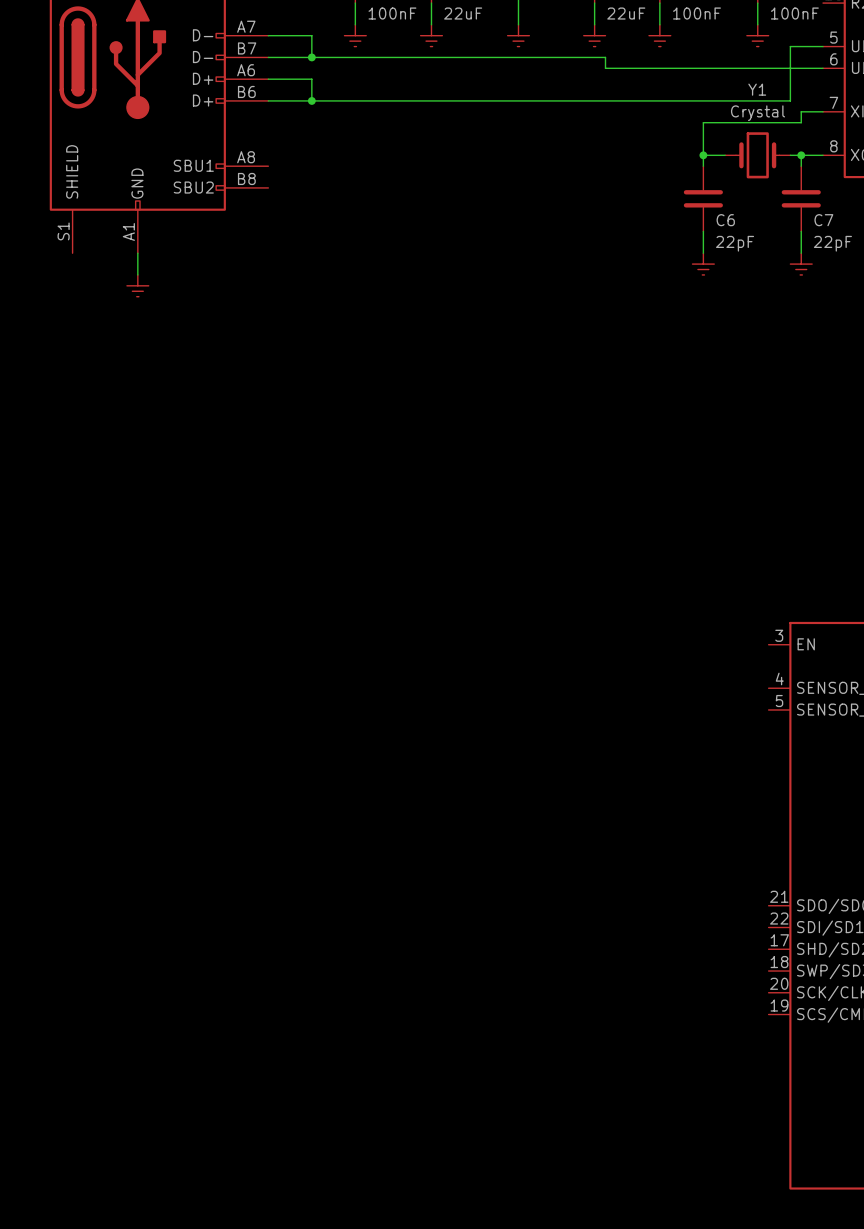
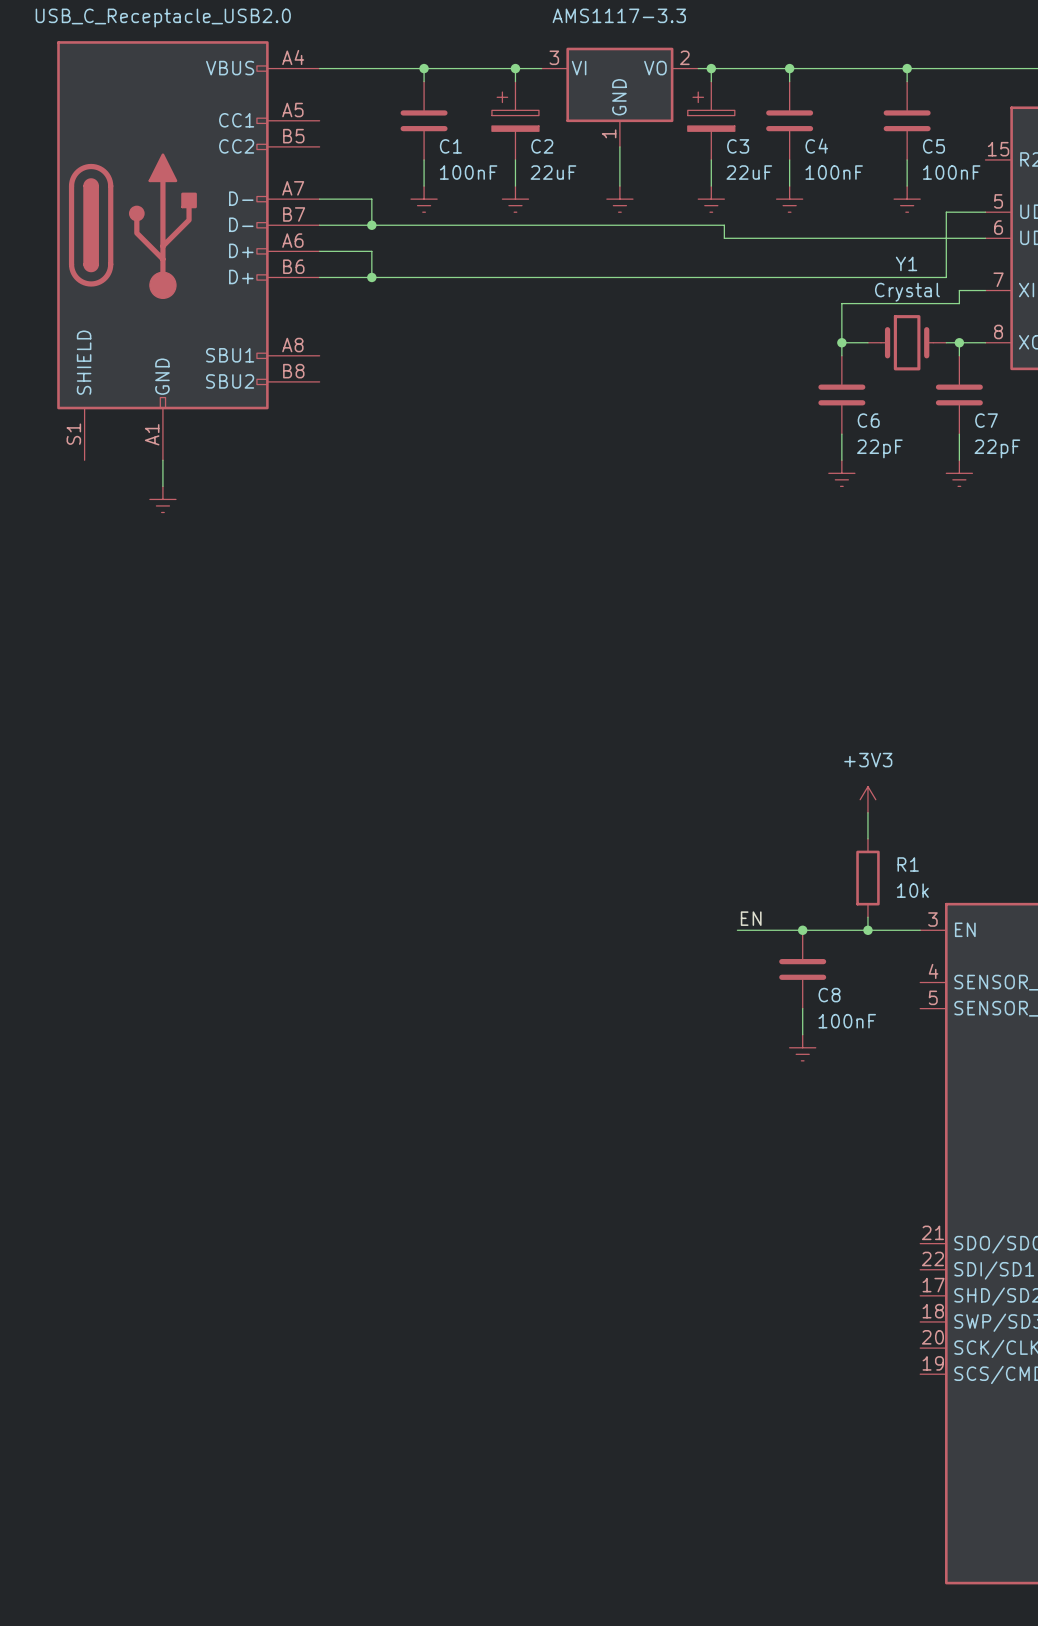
power symbol: none -> +3V3 (867, 799)
wire: none -> (867, 812) (867, 838)
R1: none -> 10k (867, 878)
wire: none -> (867, 917) (867, 930)
label: none -> EN (751, 918)
wire: none -> (737, 930) (920, 930)
junction: none -> (802, 930)
junction: none -> (867, 930)
C8: none -> 100nF (802, 969)
wire: none -> (802, 1008) (802, 1034)
power symbol: none -> (802, 1047)

